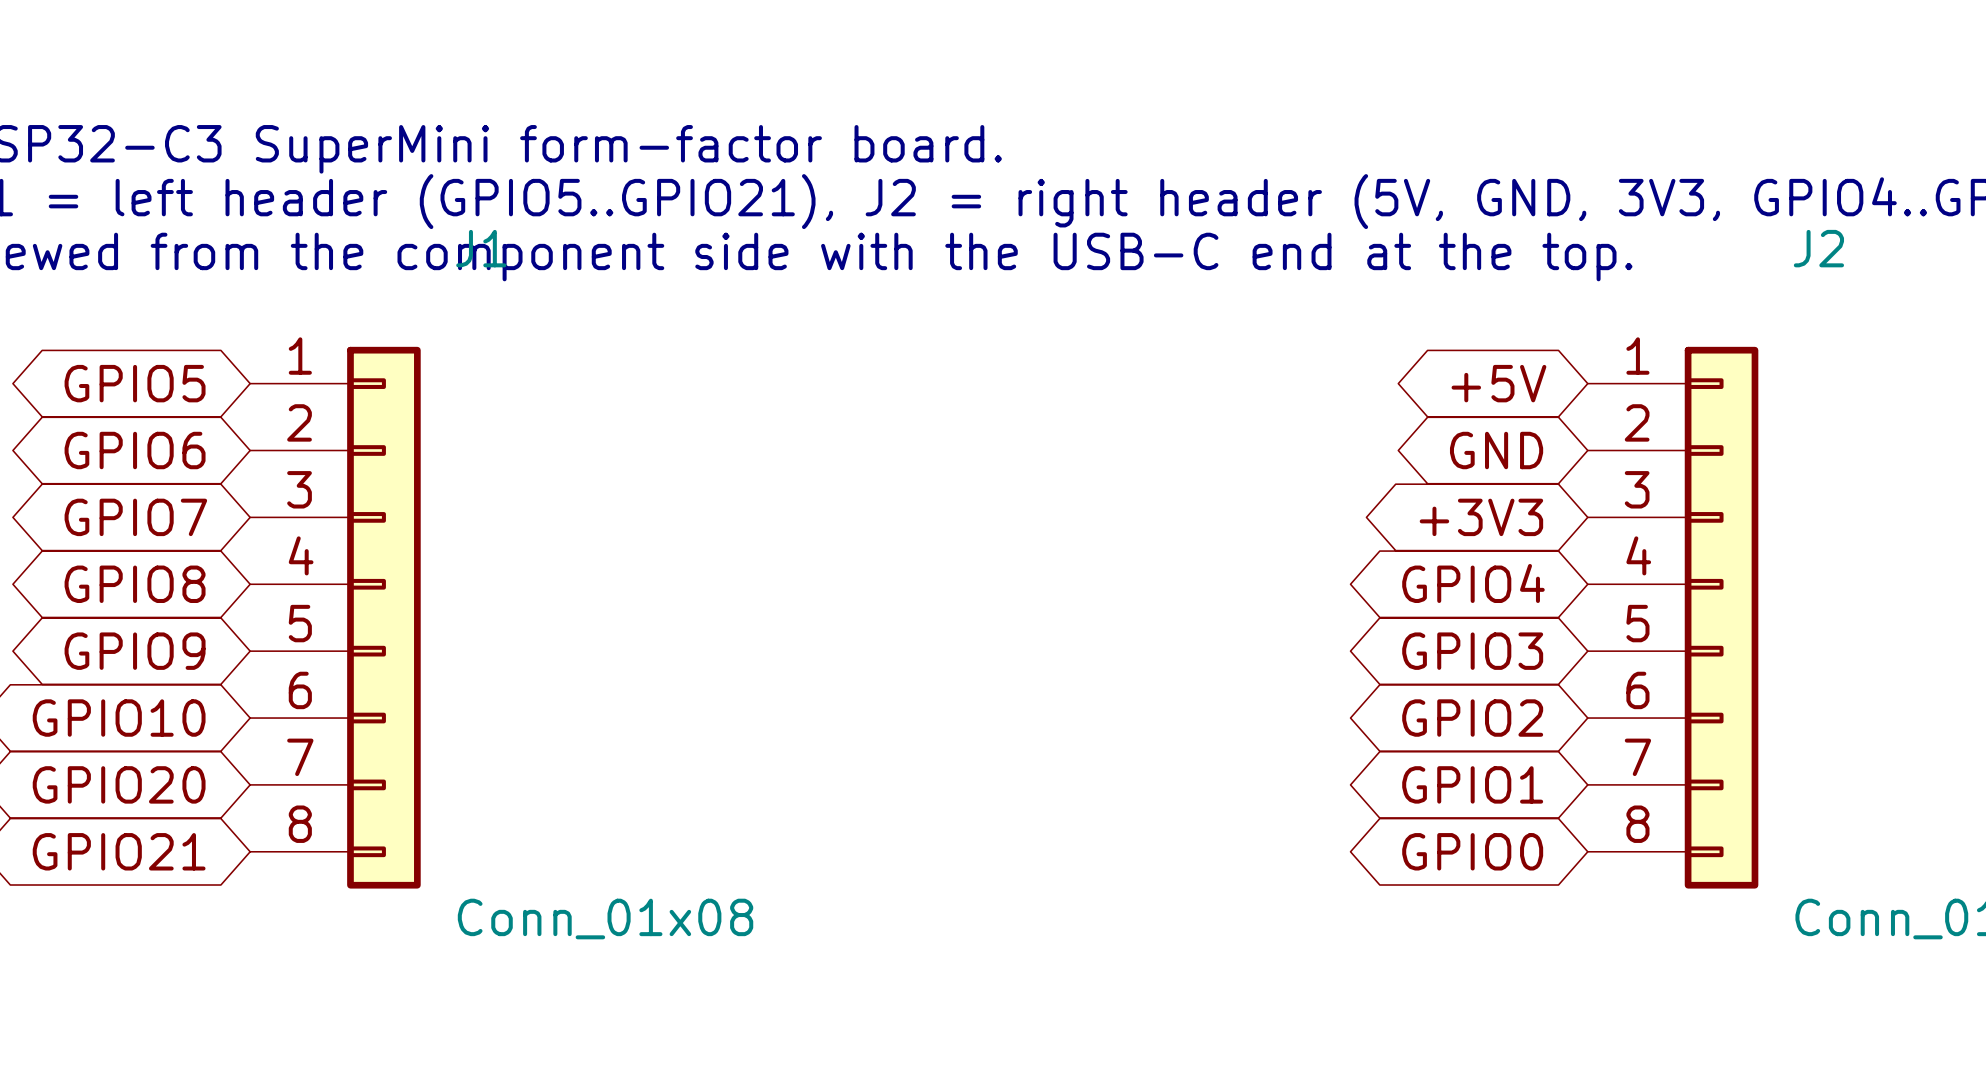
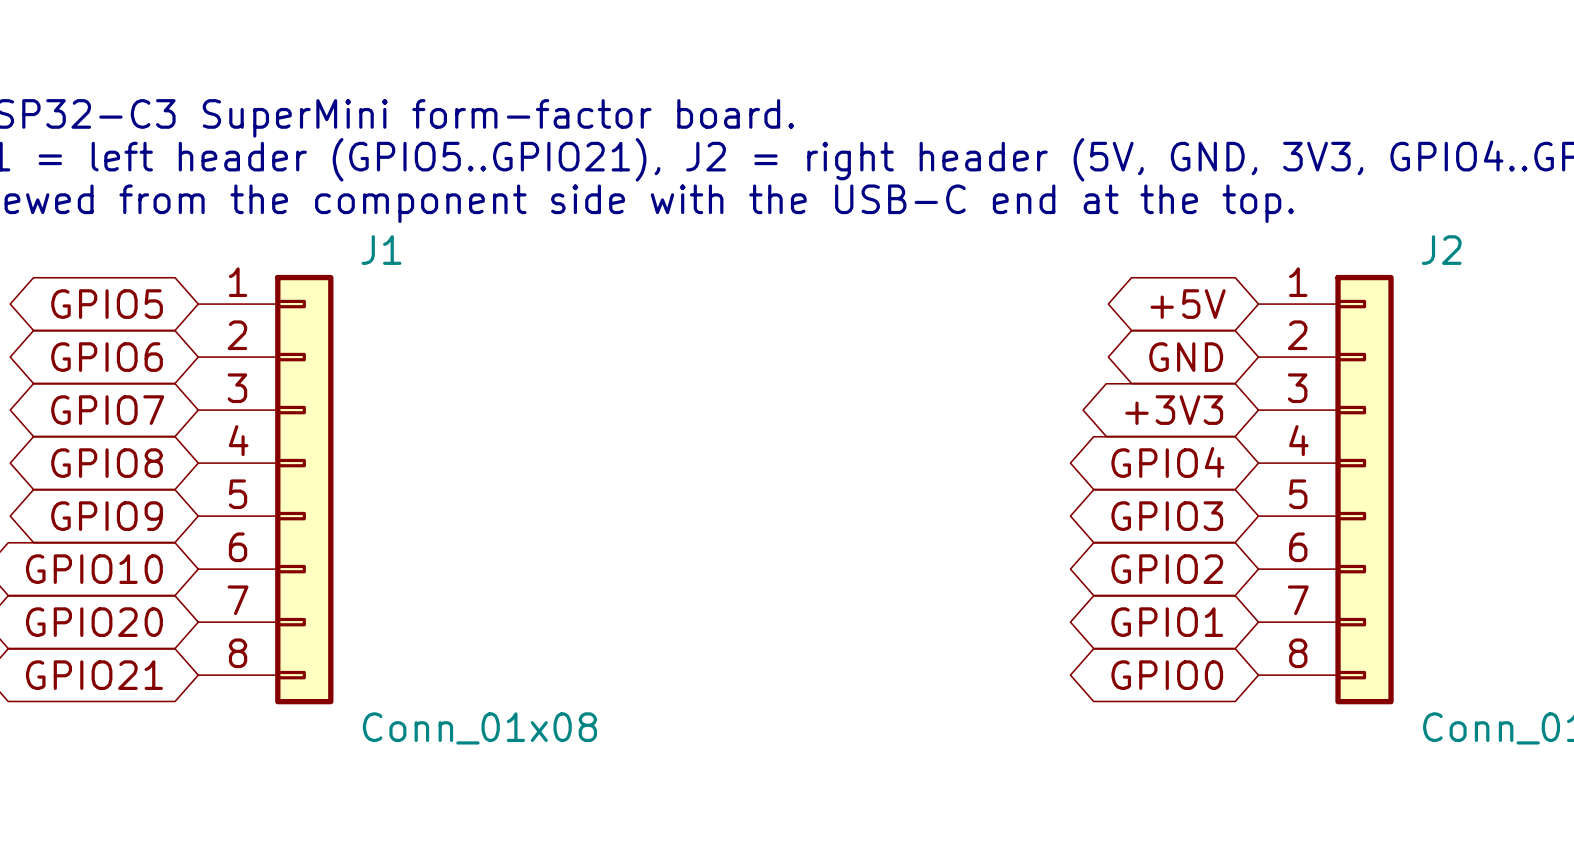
J1 name position: J1 (481, 248) -> J1 (381, 250)
J2 name position: J2 (1818, 248) -> J2 (1441, 250)

